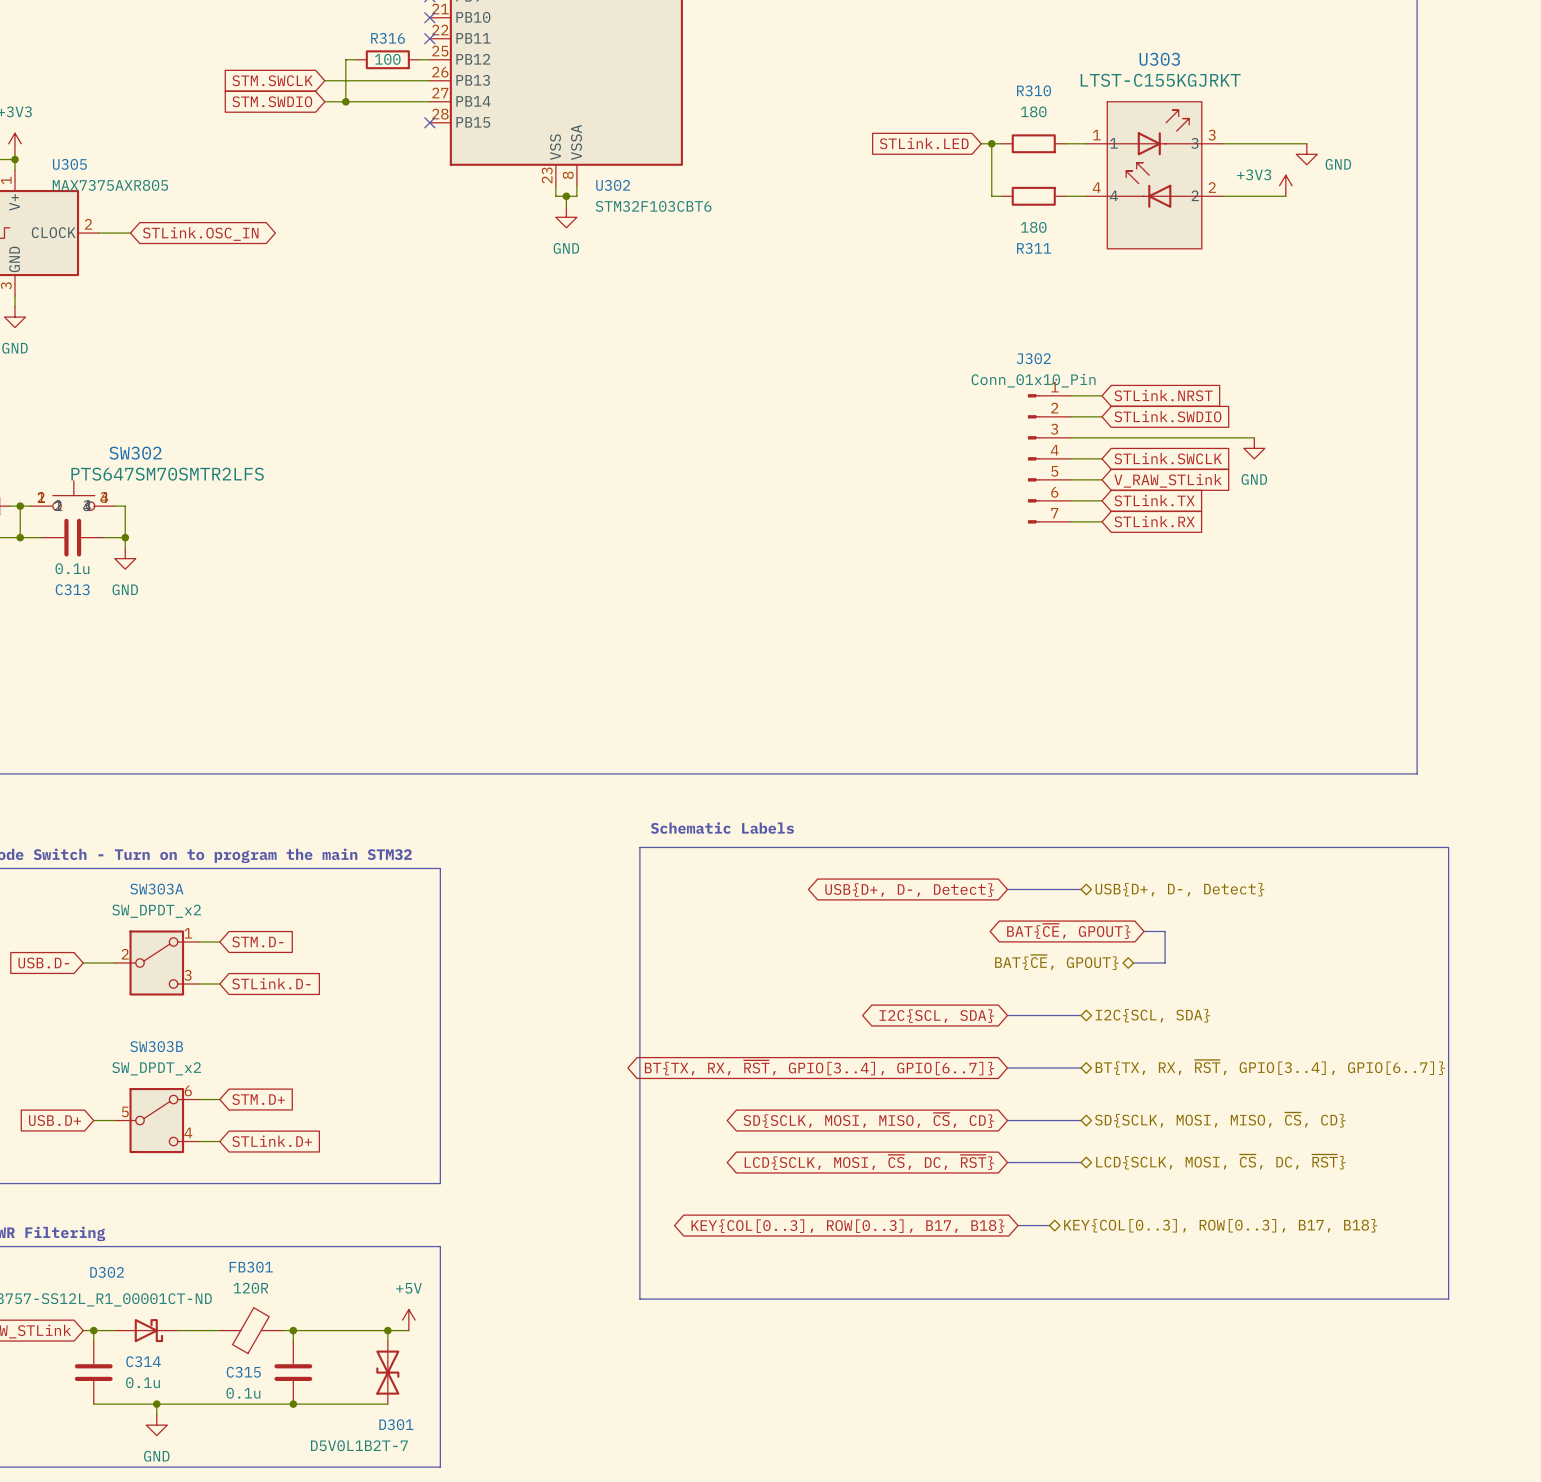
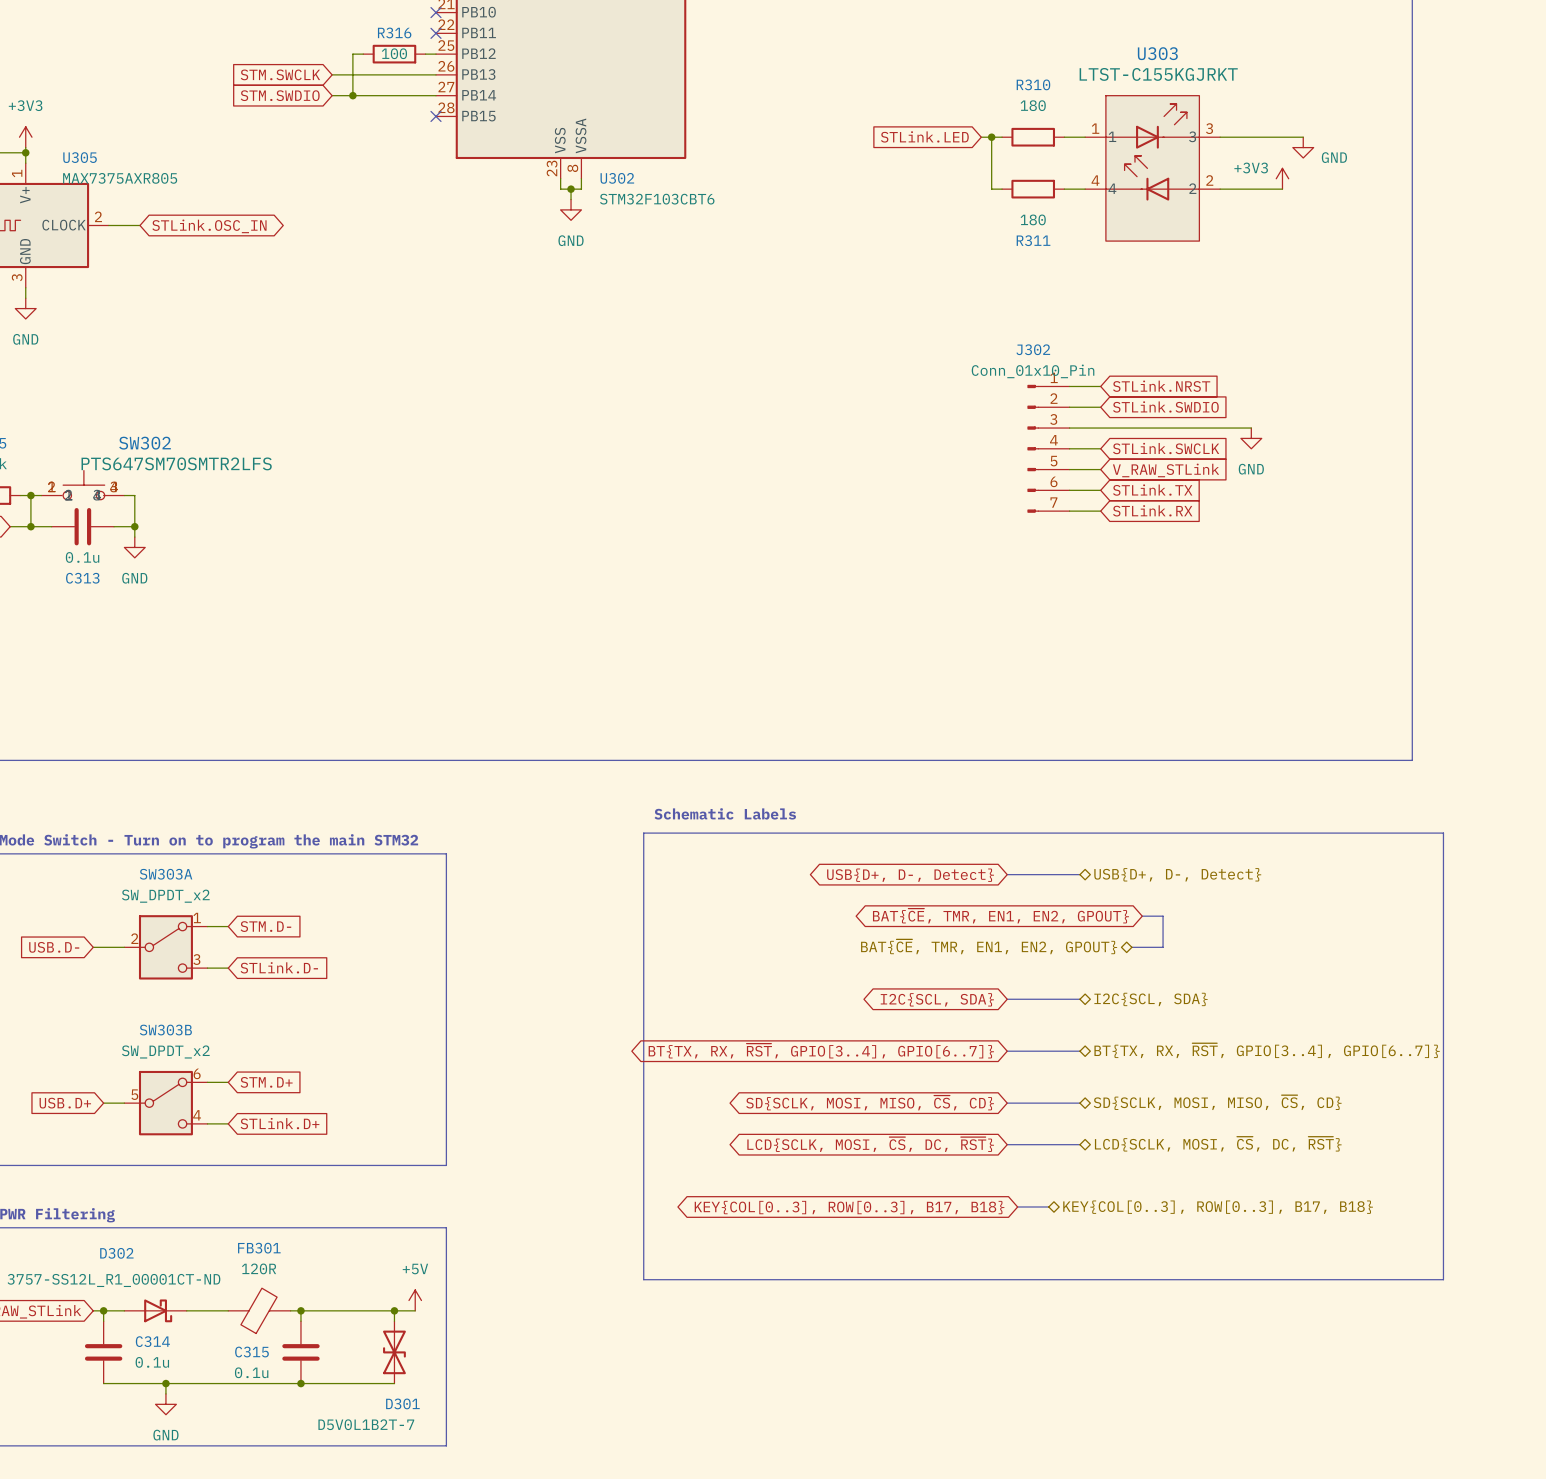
global label: BAT{~{CE}, GPOUT} (1068, 931) -> BAT{~{CE}, TMR, EN1, EN2, GPOUT} (1000, 916)
hierarchical label: BAT{~{CE}, GPOUT} (1056, 962) -> BAT{~{CE}, TMR, EN1, EN2, GPOUT} (989, 946)

